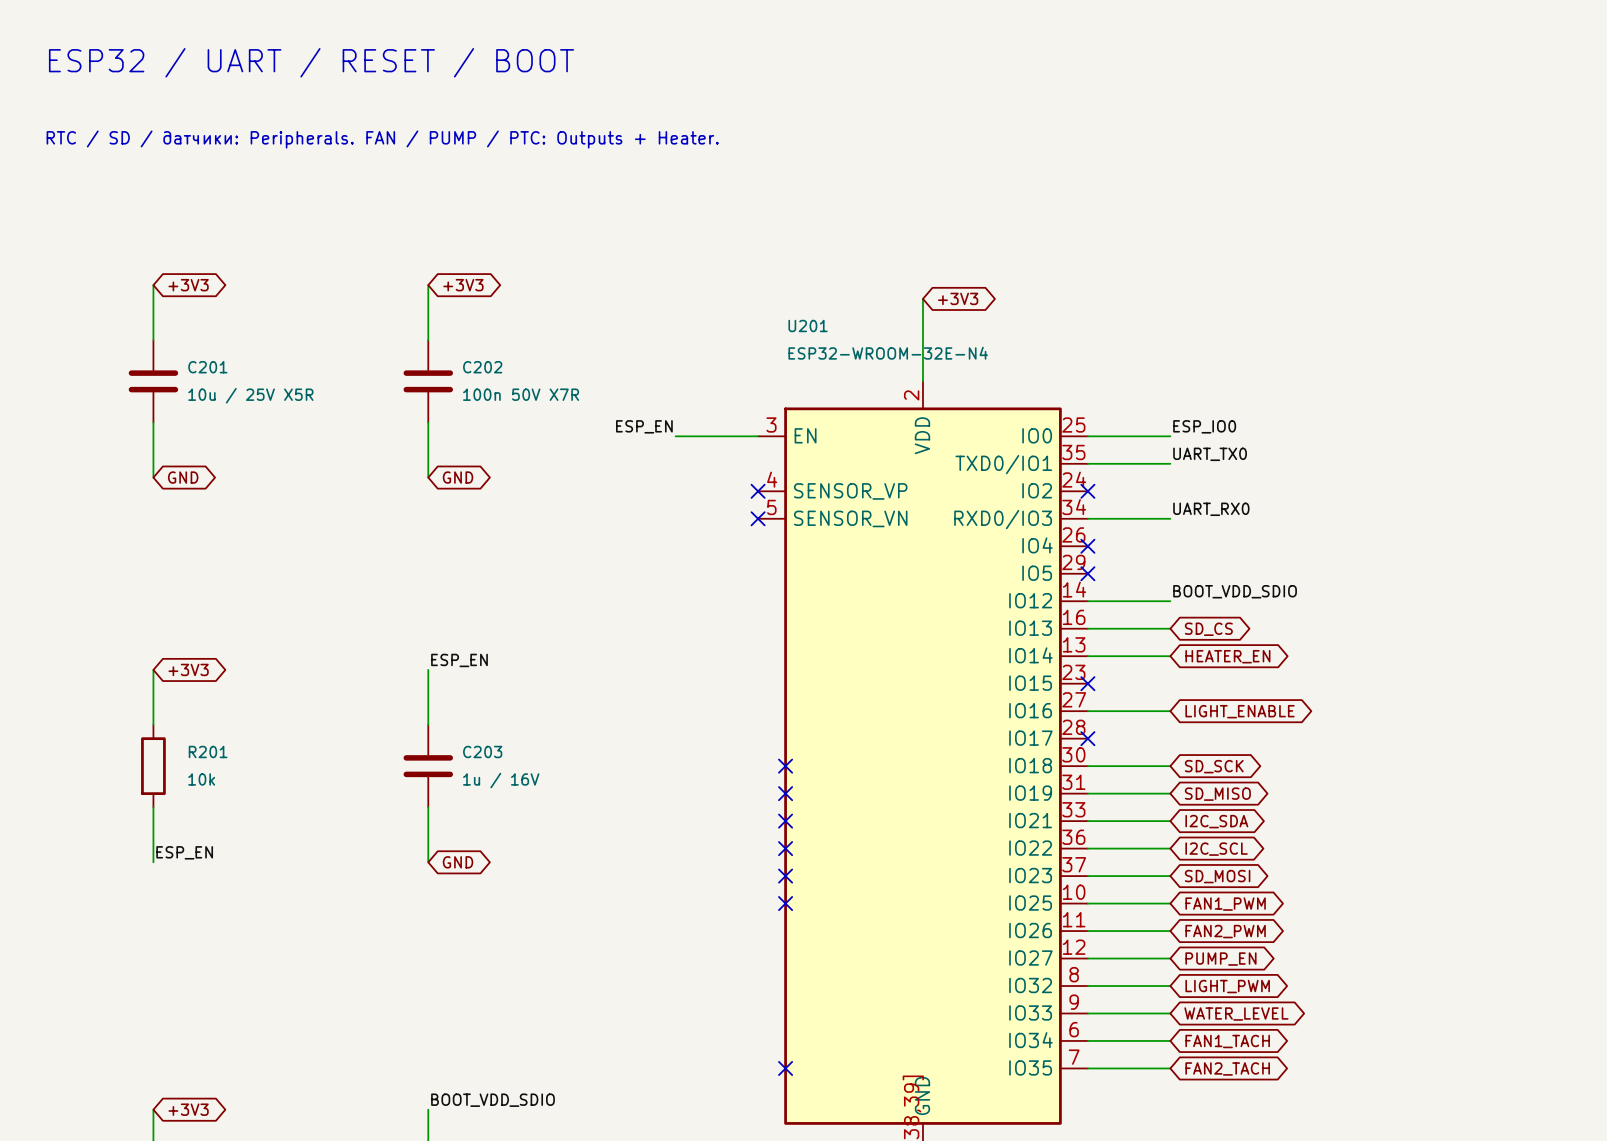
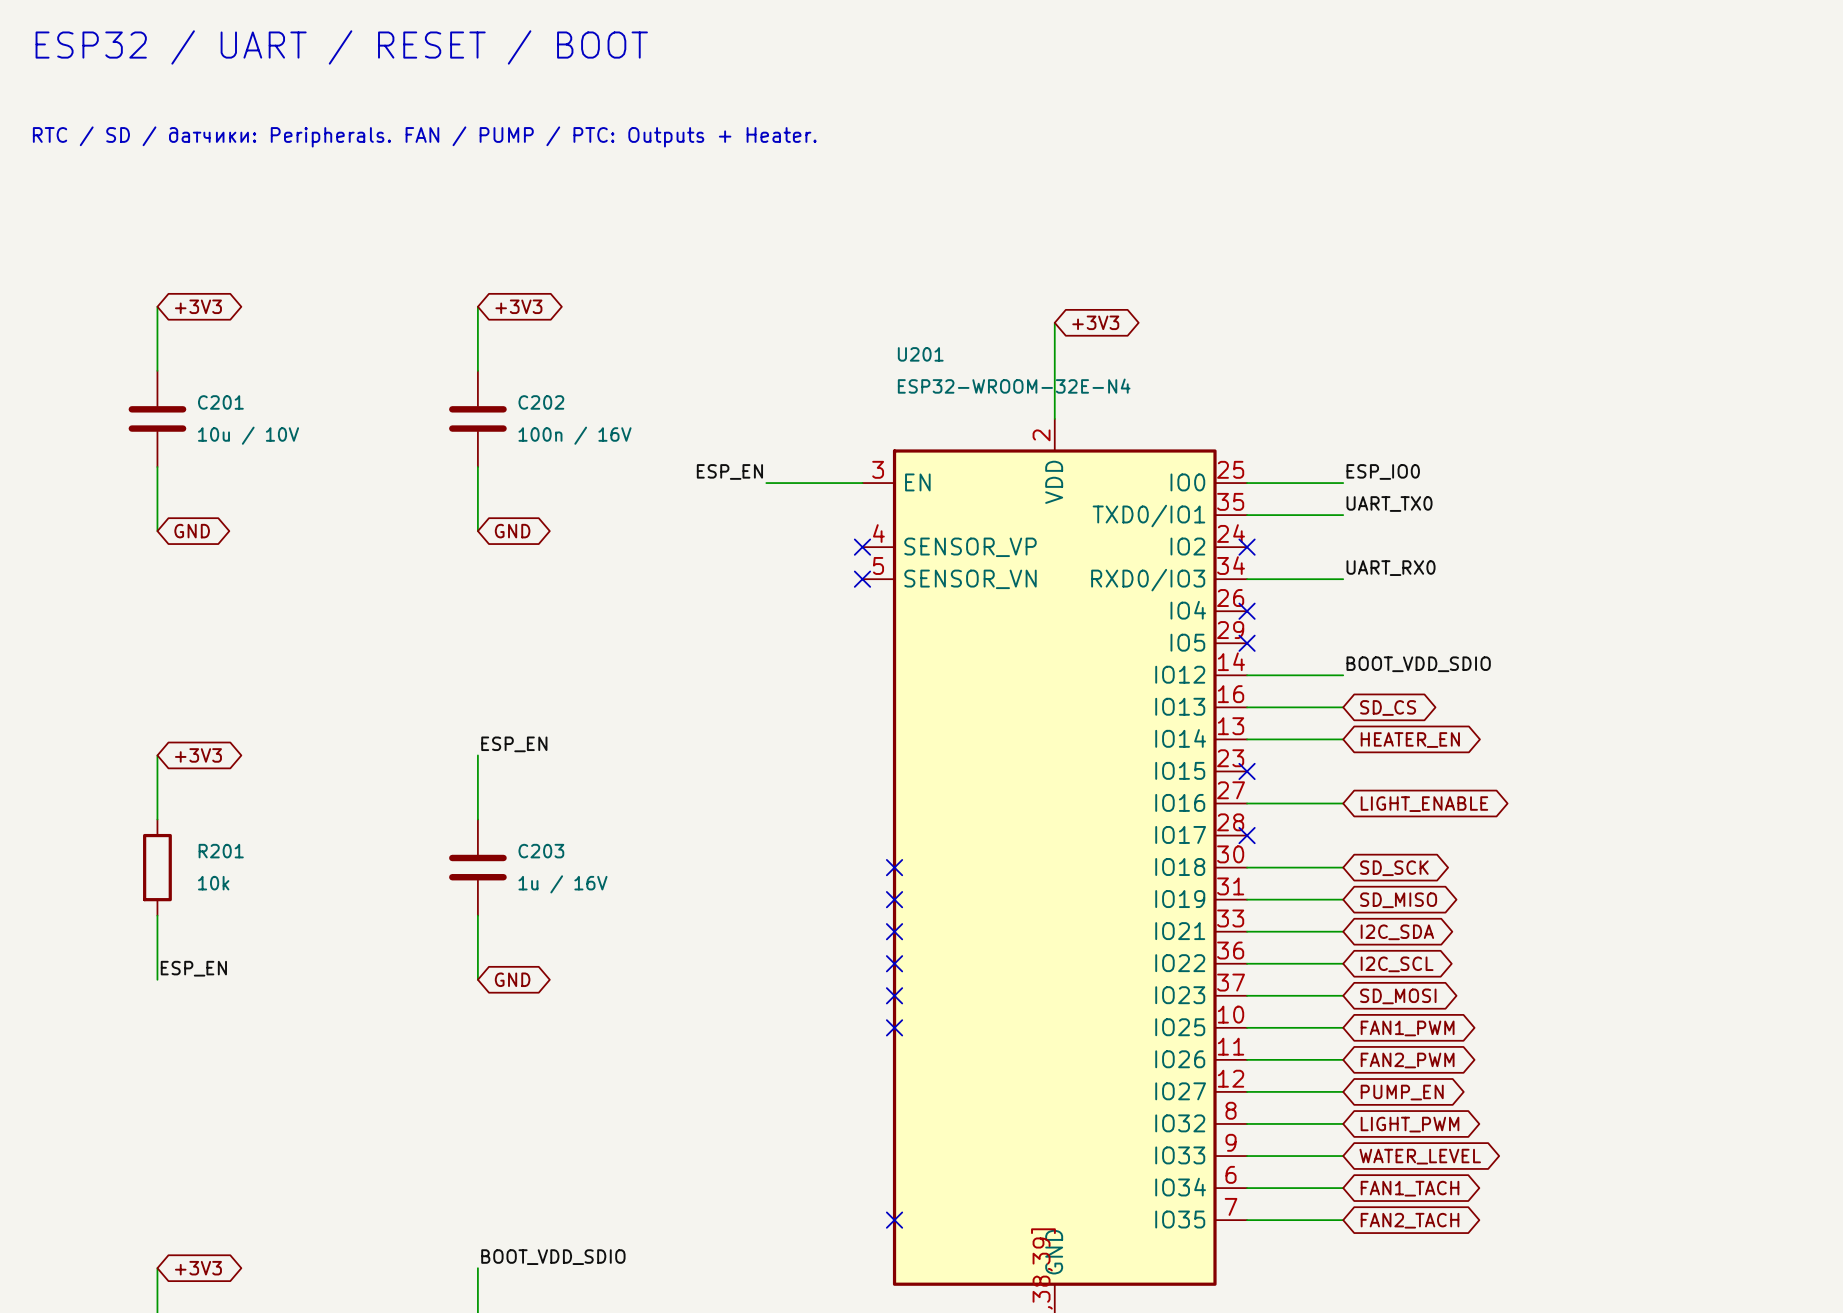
C202 value: 100n 50V X7R (521, 394) -> 100n / 16V (575, 435)
C201 value: 10u / 25V X5R (250, 395) -> 10u / 10V (248, 435)

